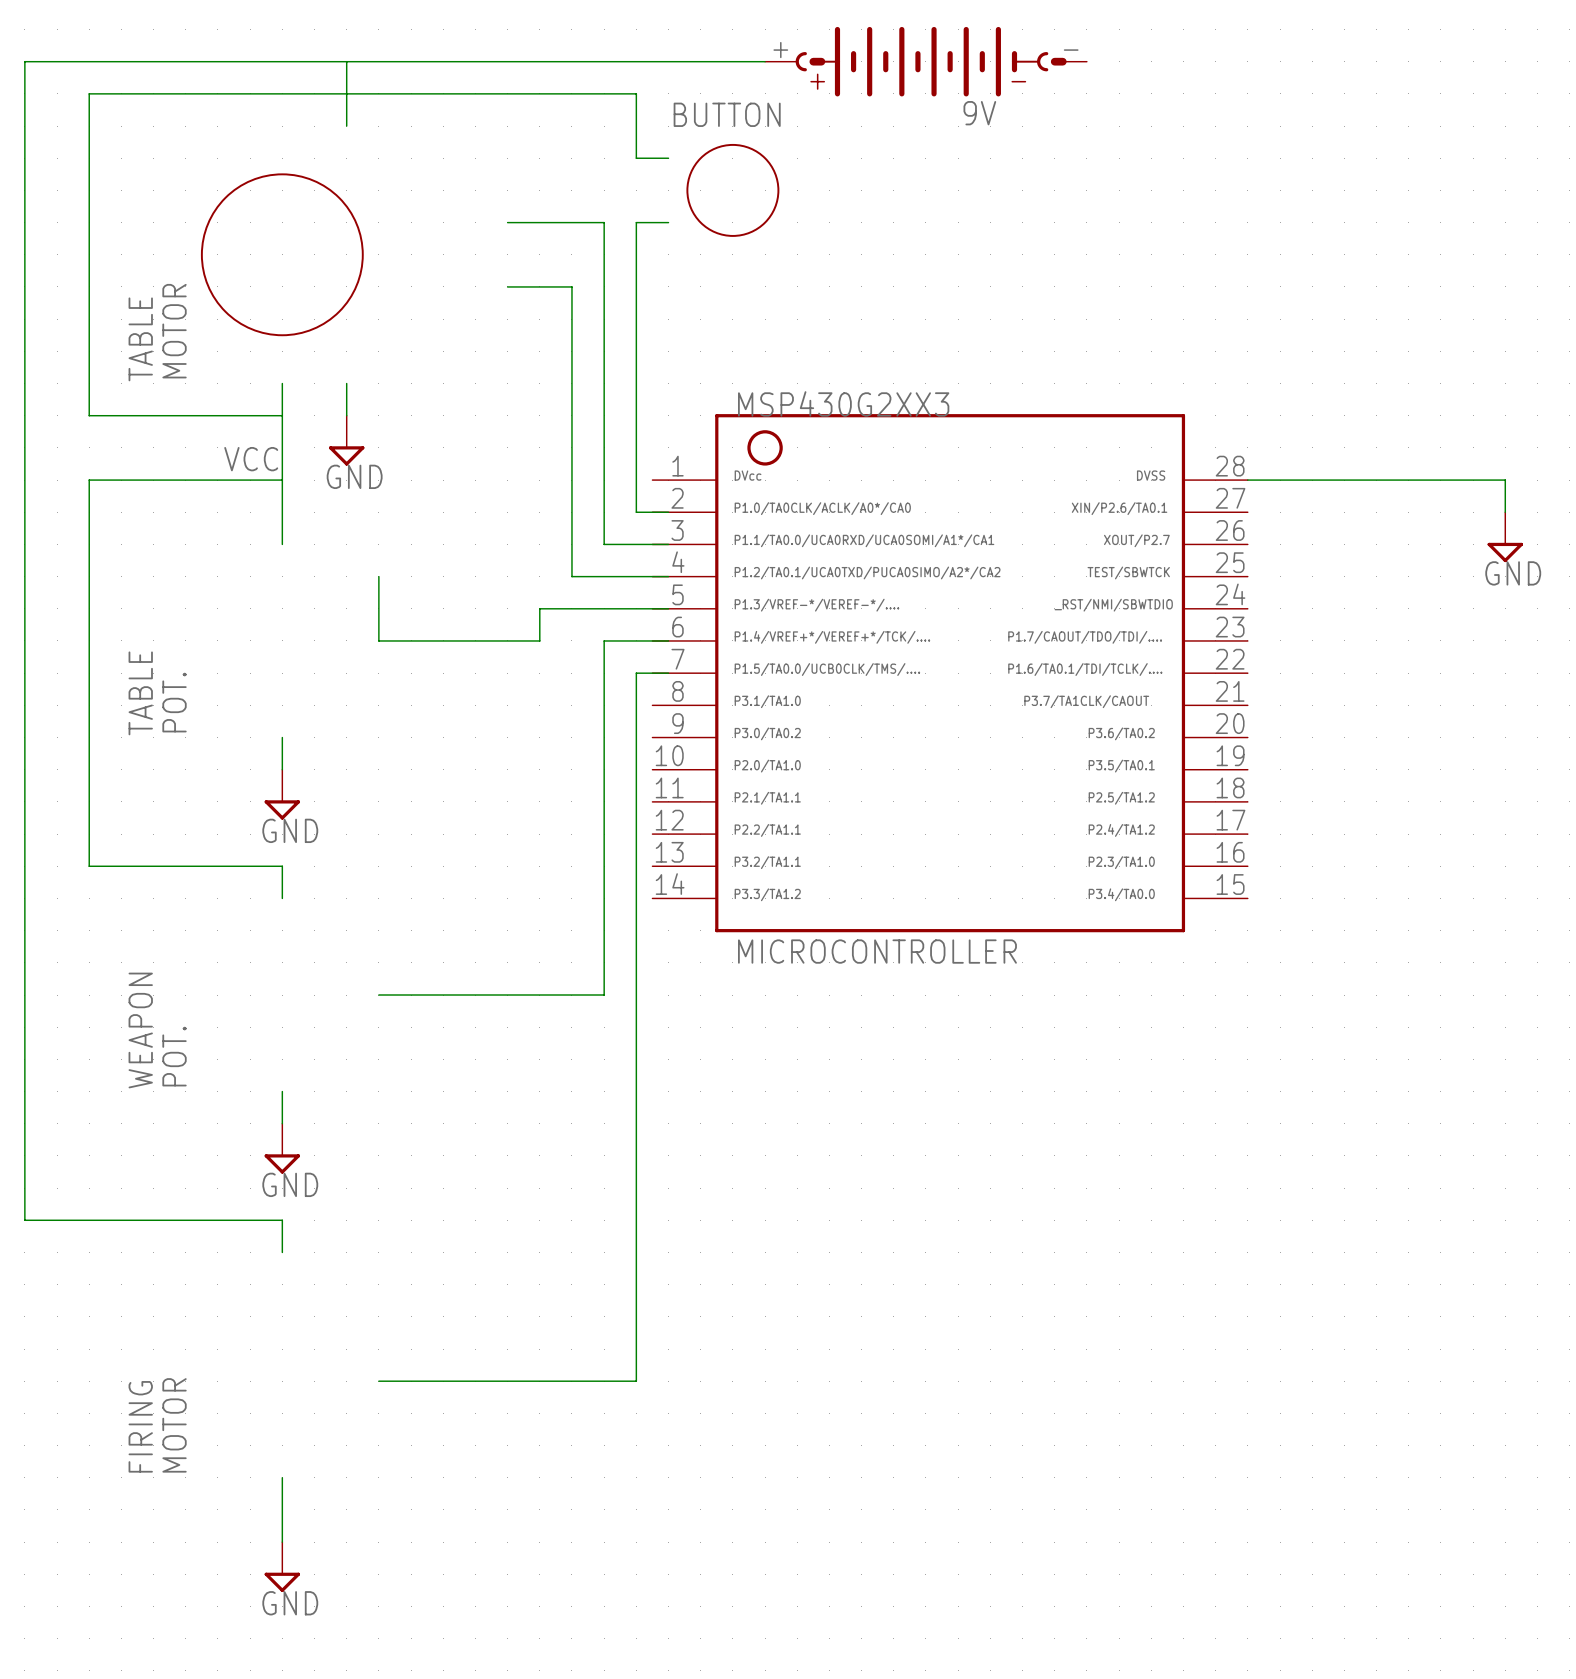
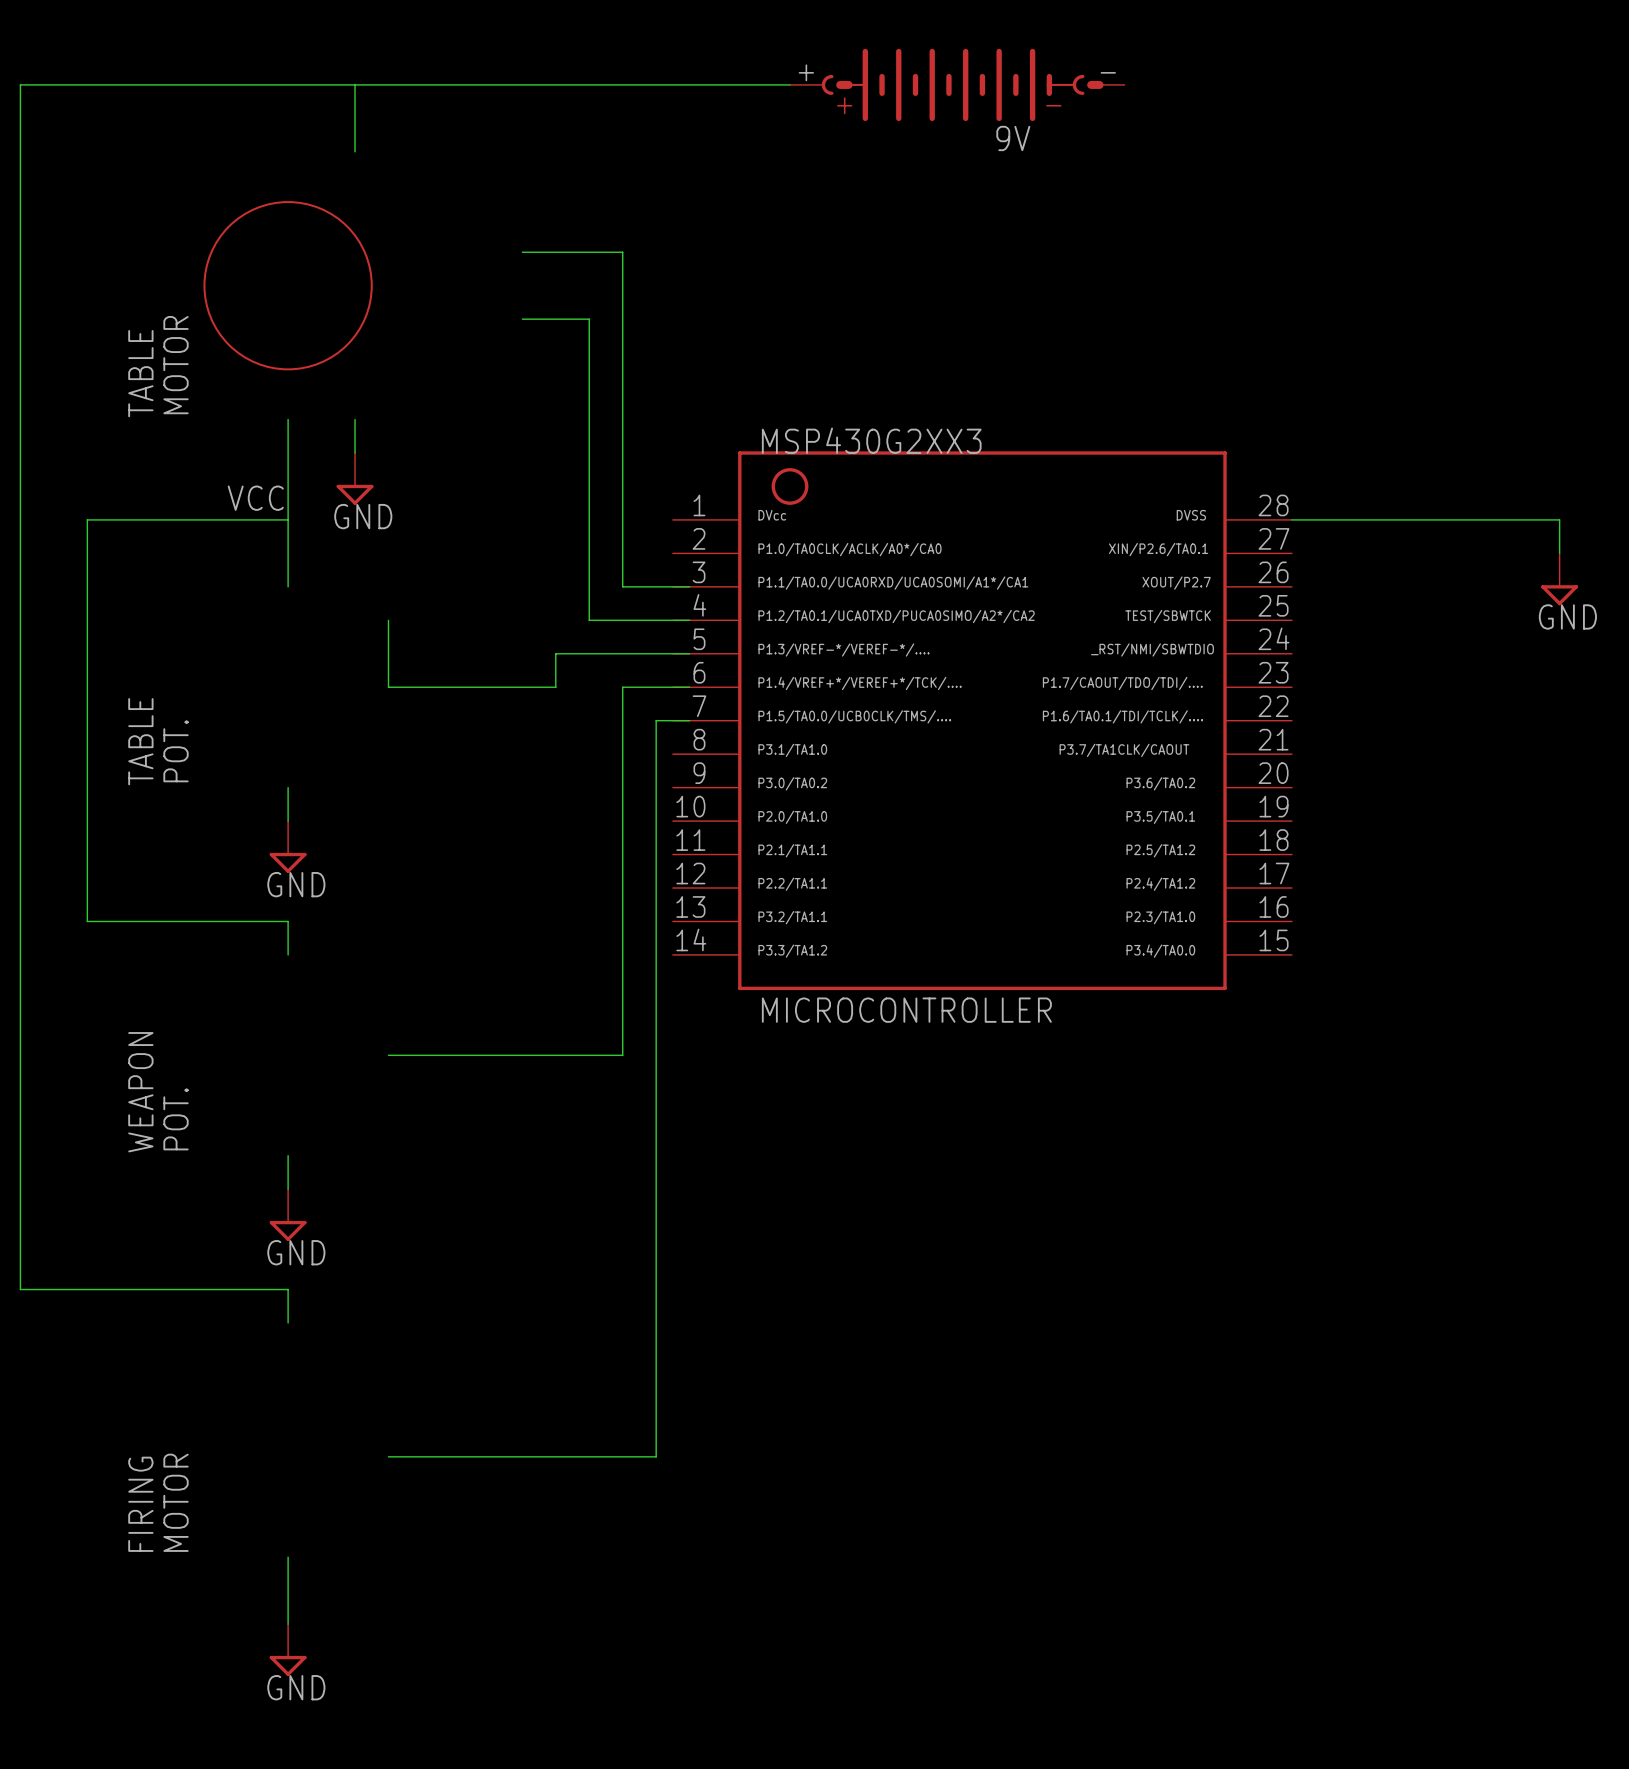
text: BUTTON (727, 114) -> none
drawing: [686, 143, 780, 237] -> none
wire: (668, 158) (636, 158) (636, 93) (89, 93) (89, 415) (282, 415) -> none
wire: (668, 222) (636, 222) (636, 512) (668, 512) -> none

